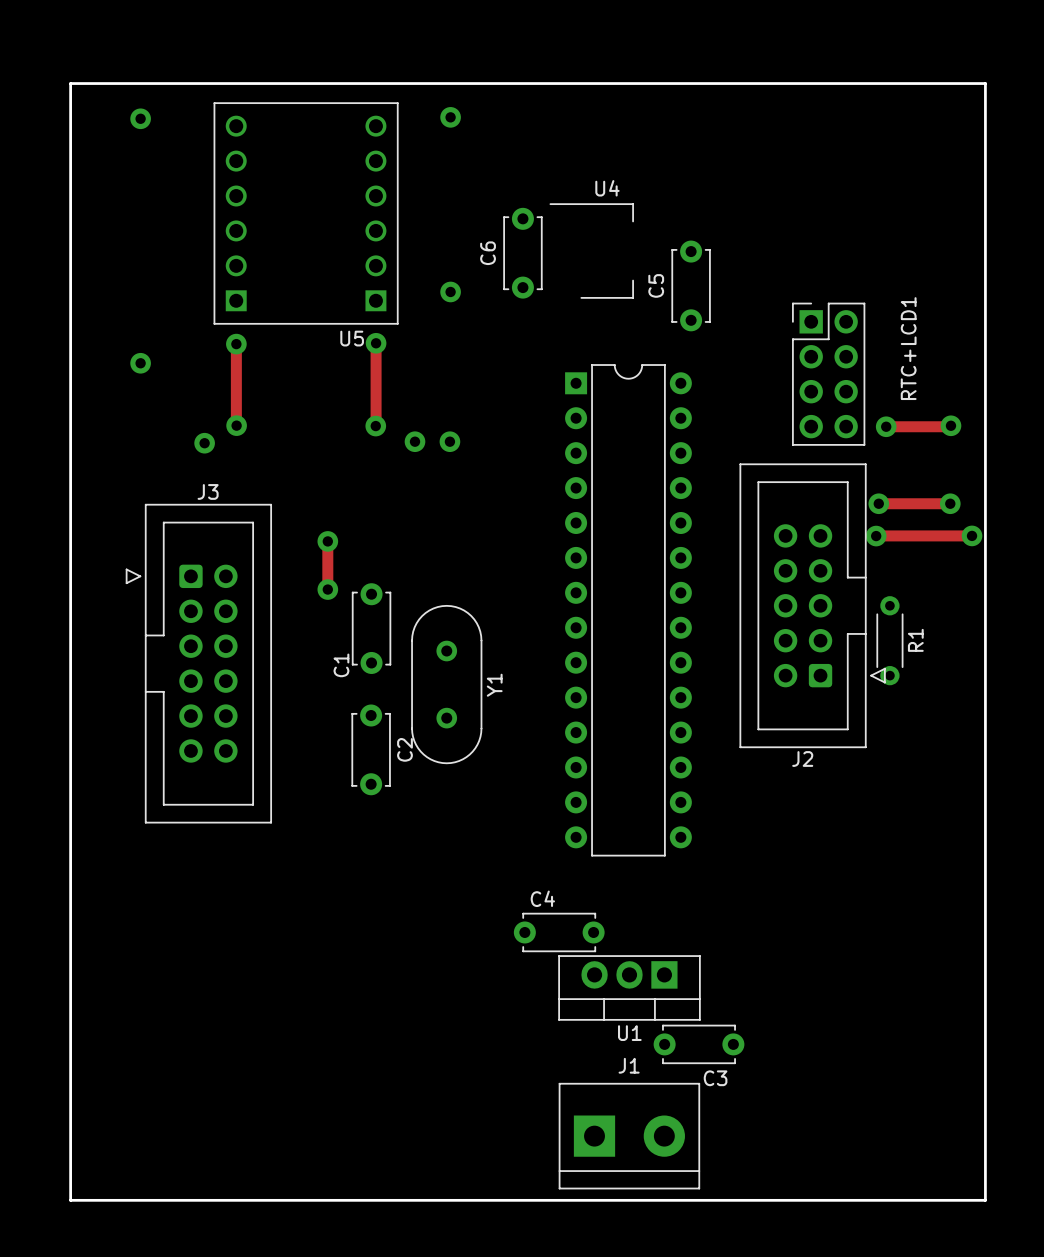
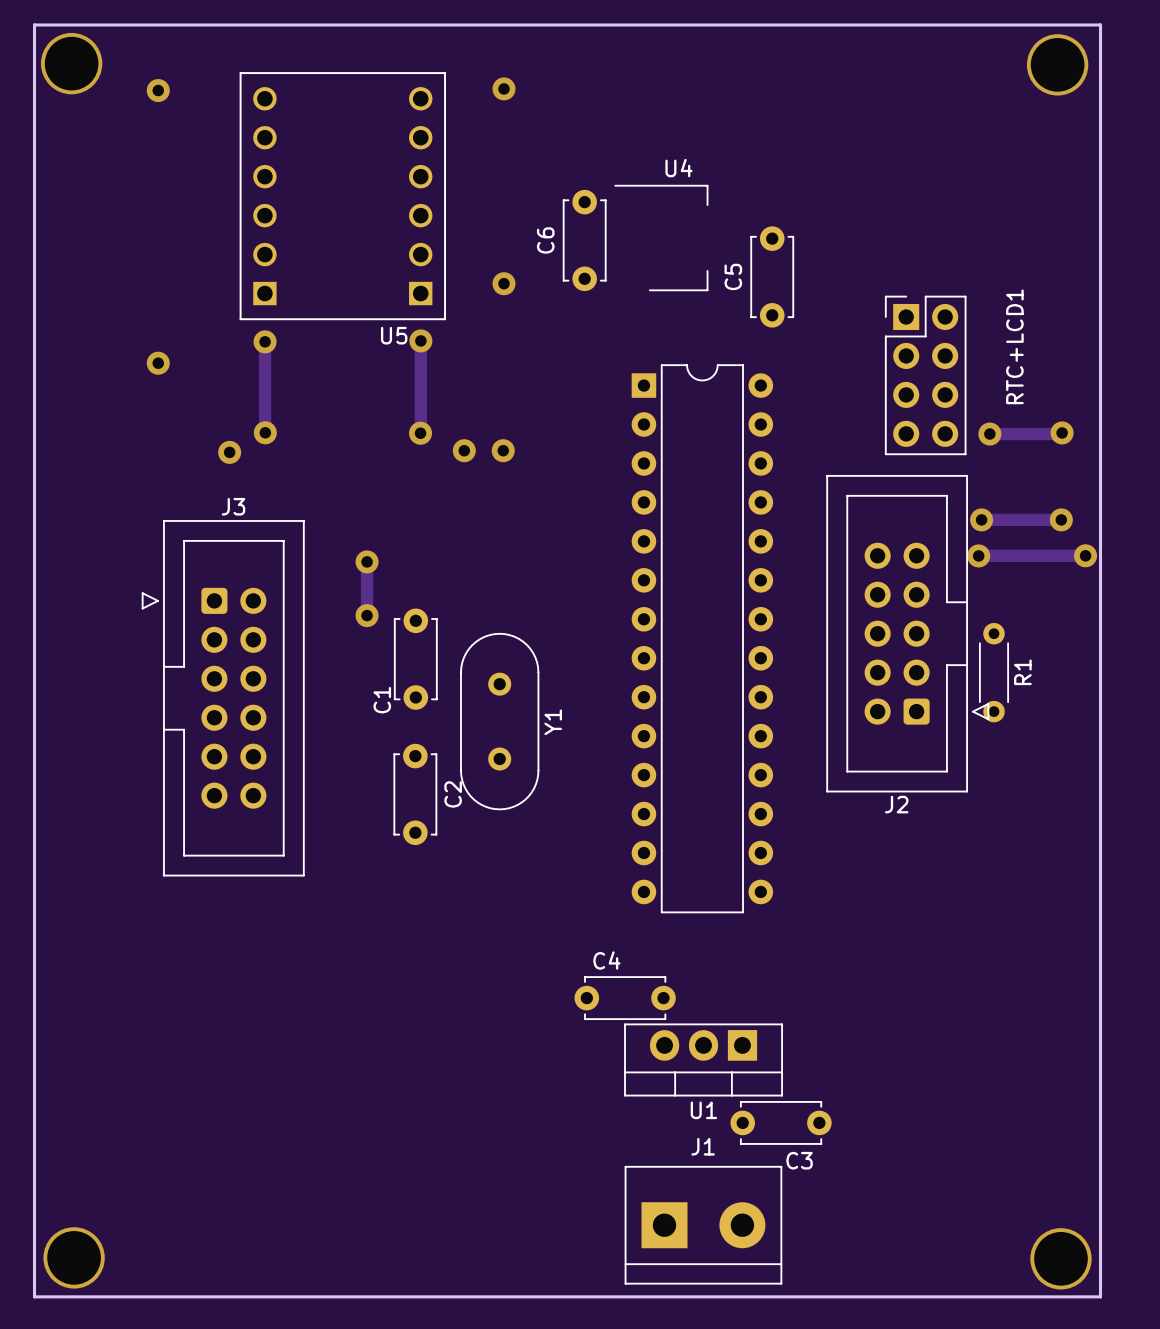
board edge: (985, 83) (70, 83) (70, 1200) -> (1100, 51) (1100, 24) (34, 24) (34, 1296) (80, 1296)
via: none -> (71, 63)
via: none -> (1057, 64)
via: none -> (74, 1257)
via: none -> (1060, 1258)

